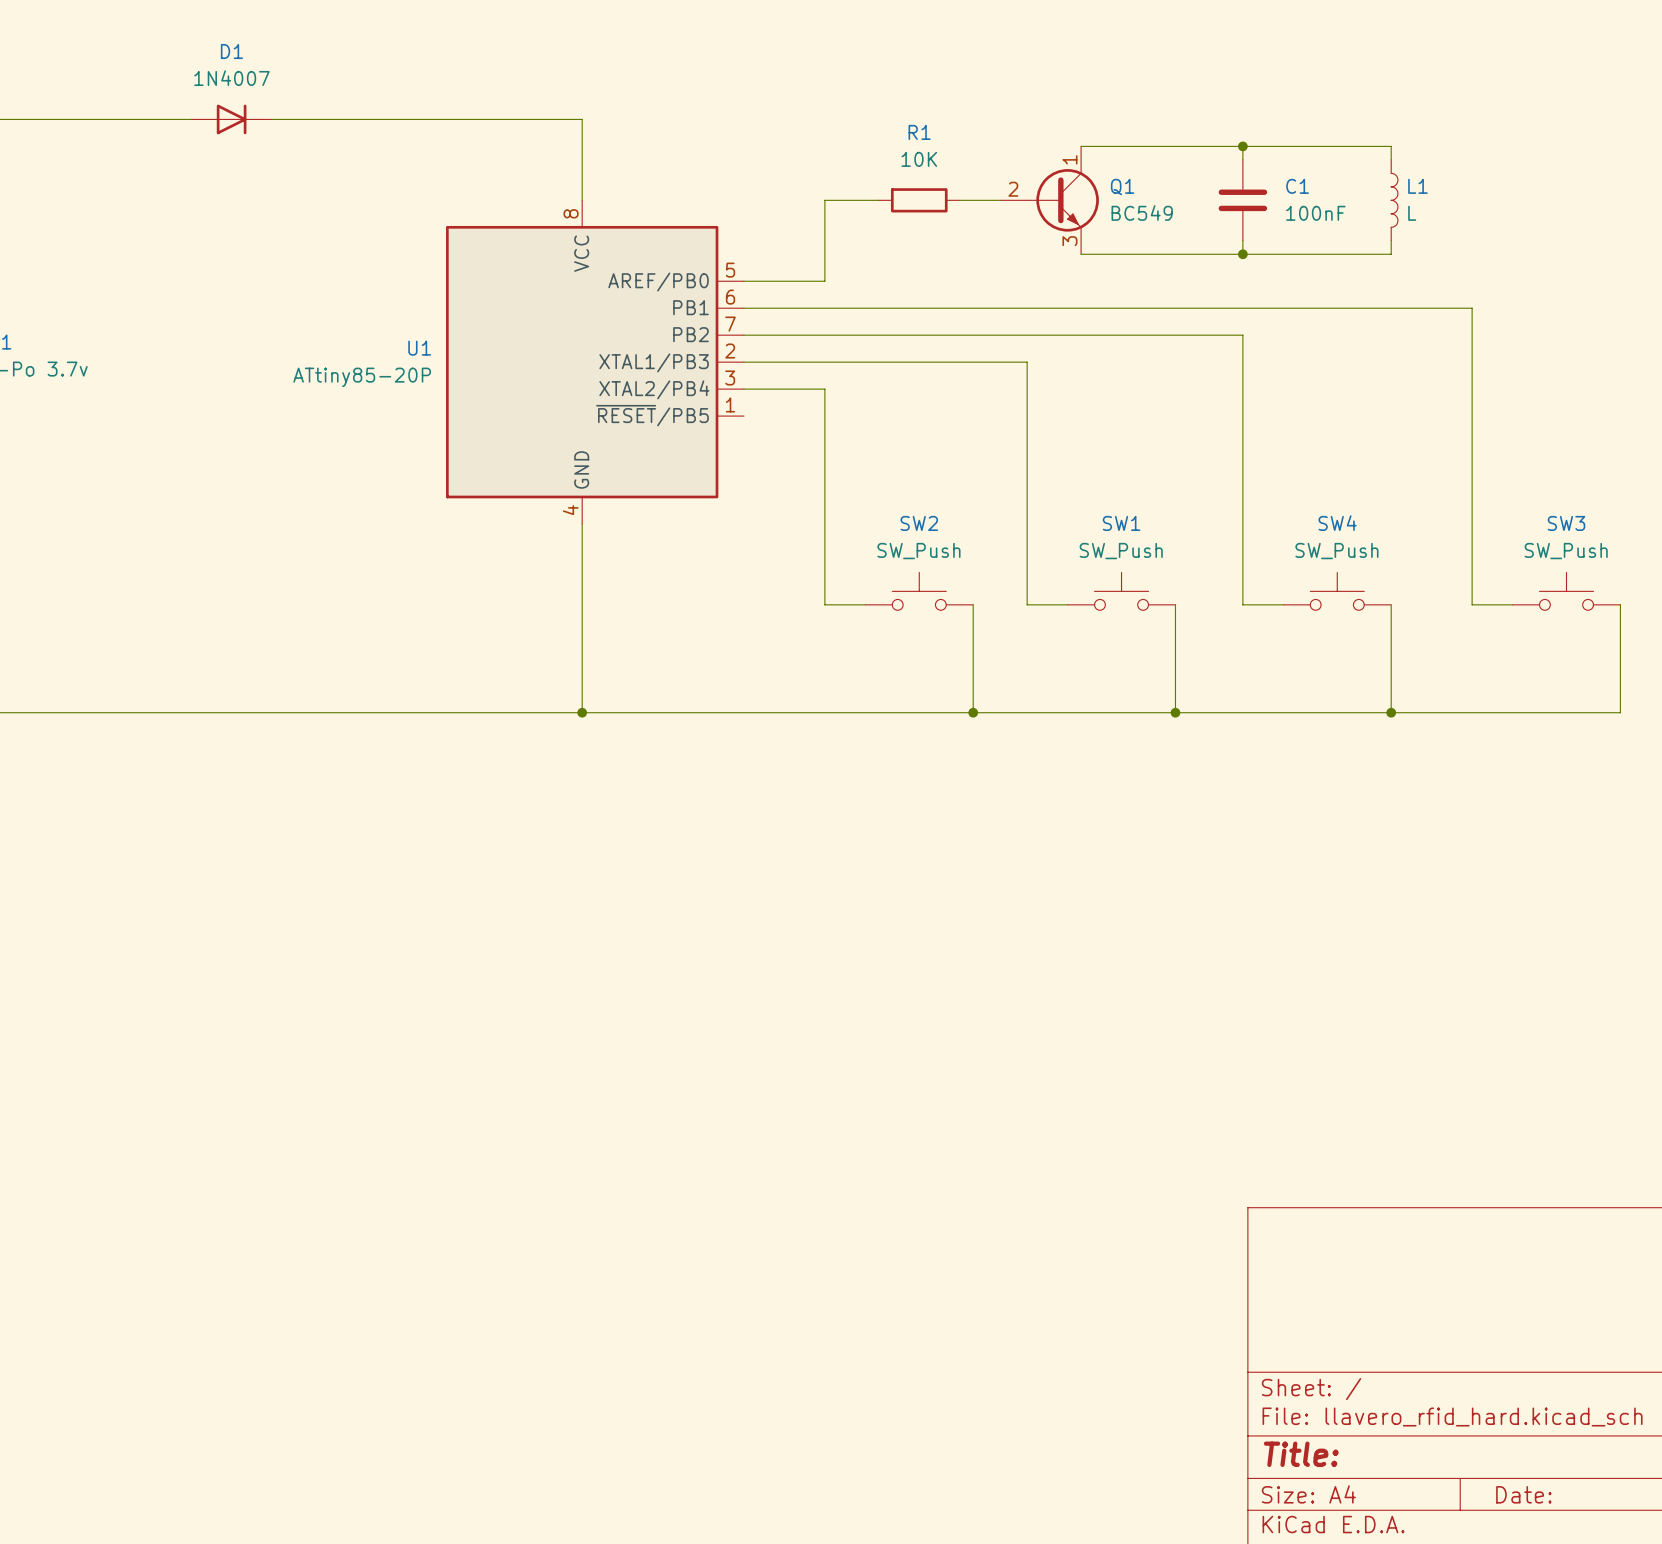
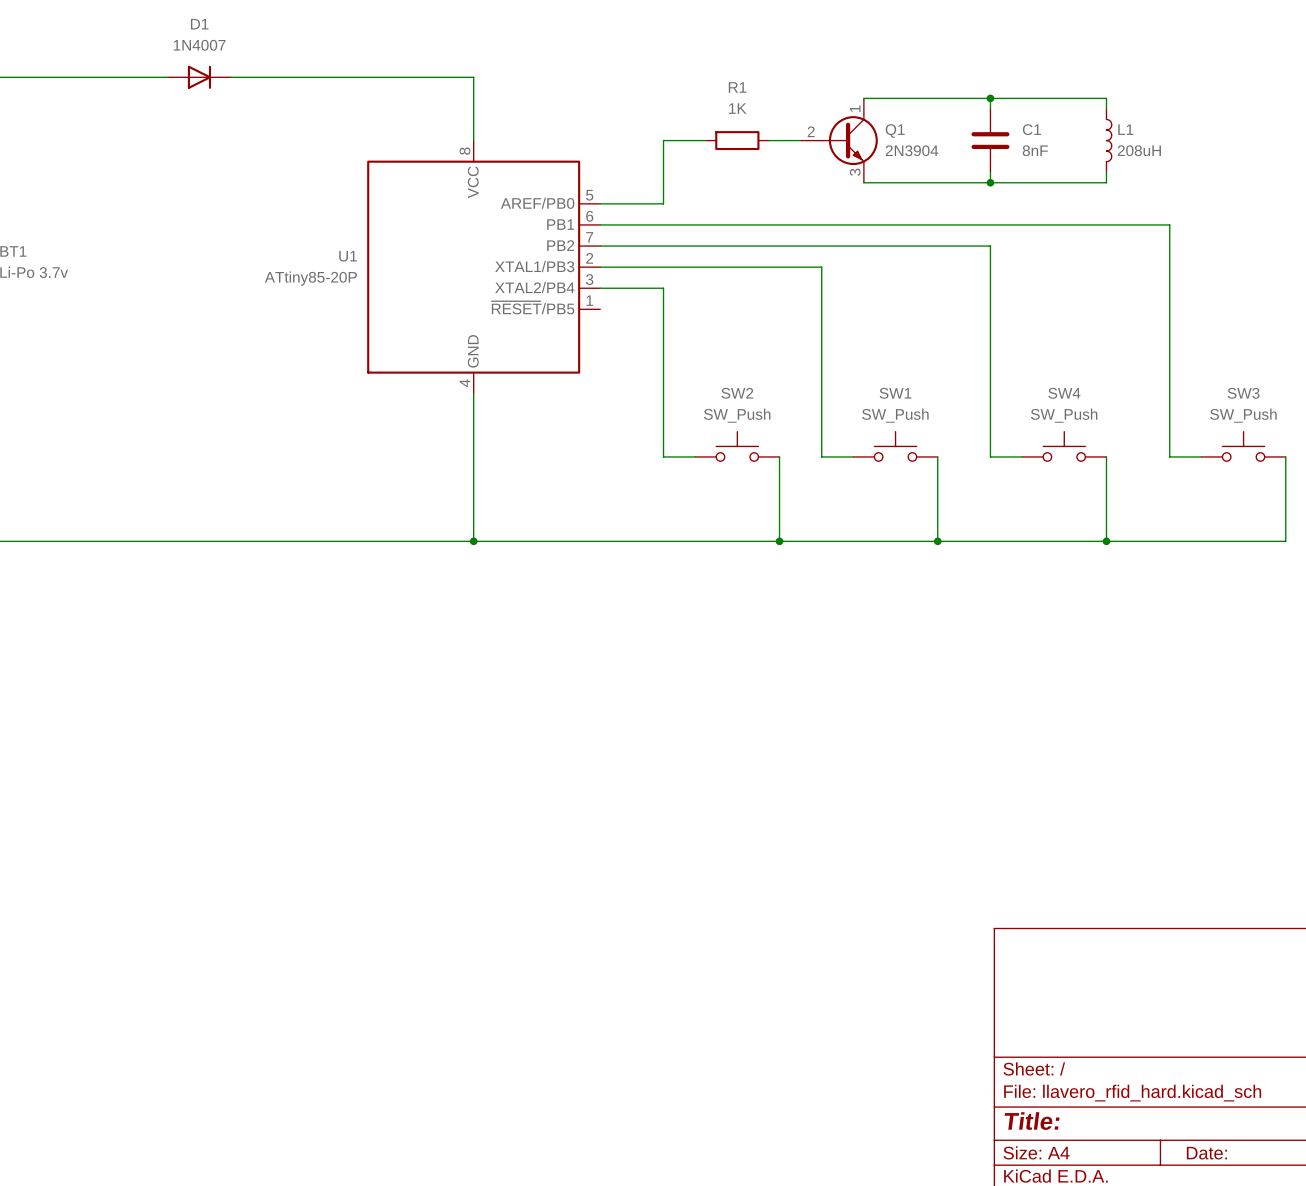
R1 value: 10K (919, 159) -> 1K (737, 108)
Q1 value: BC549 (1142, 212) -> 2N3904 (912, 150)
C1 value: 100nF (1315, 213) -> 8nF (1035, 150)
L1 value: L (1412, 213) -> 208uH (1139, 150)

